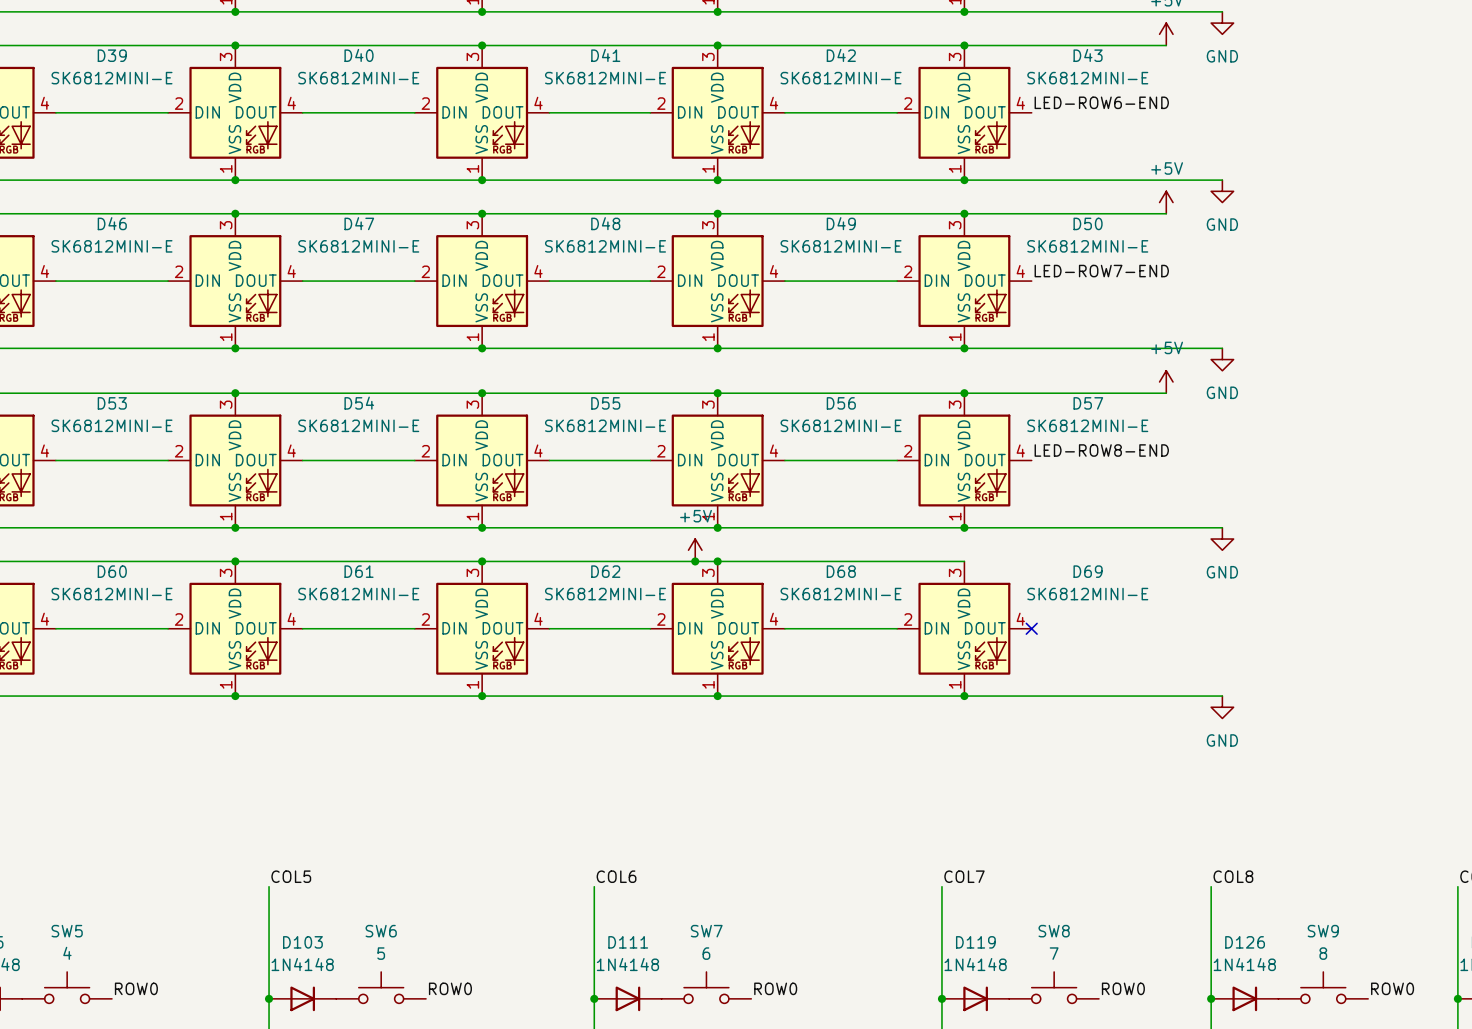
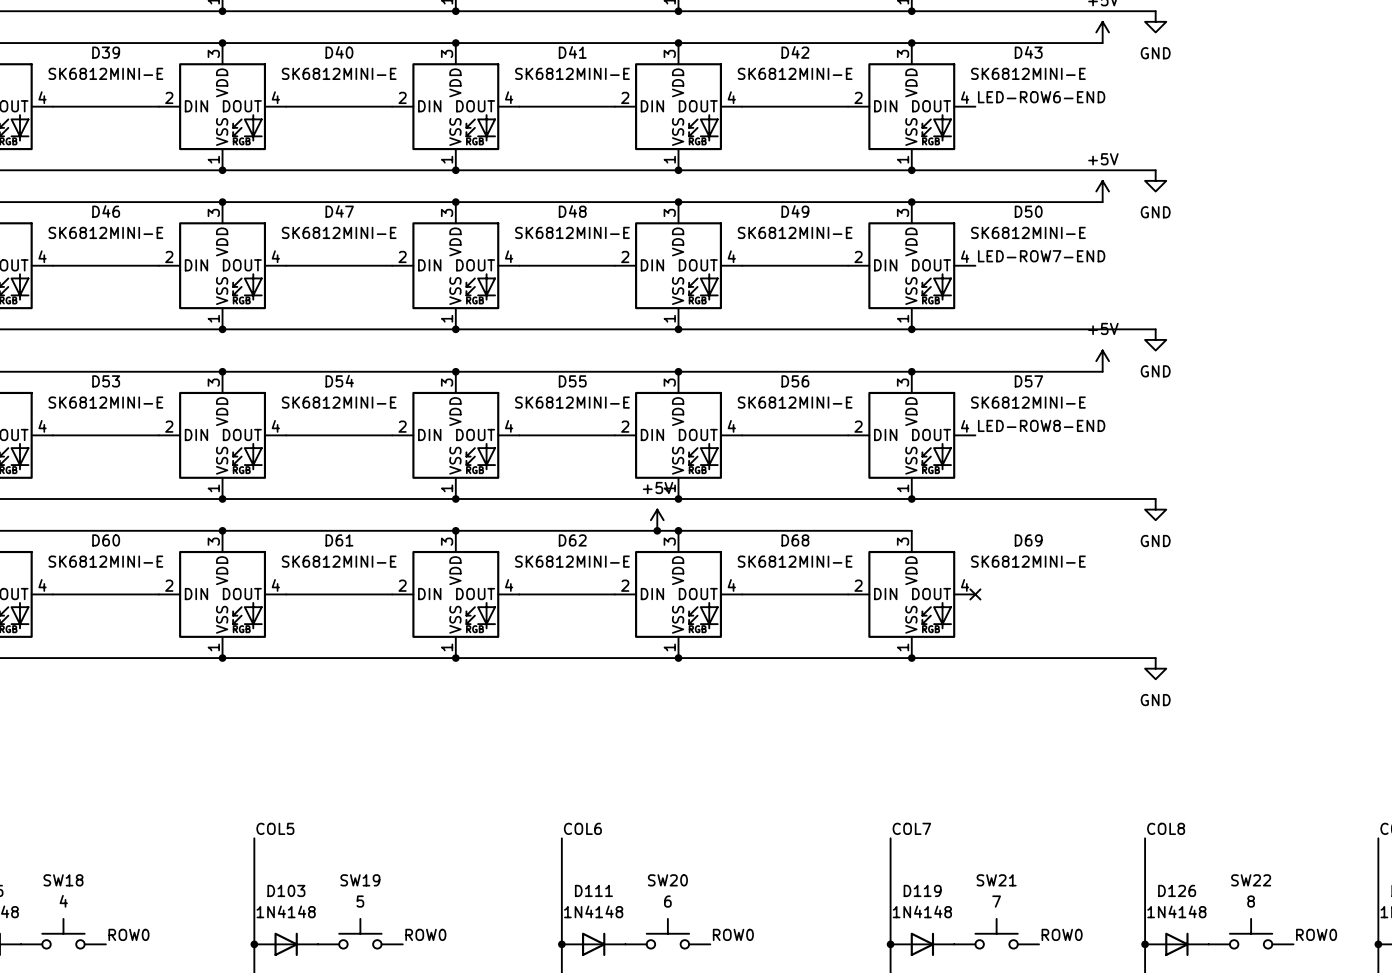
SW5 name: SW5 (67, 931) -> SW18 (63, 880)
SW6 name: SW6 (381, 931) -> SW19 (360, 880)
SW7 name: SW7 (706, 931) -> SW20 (667, 880)
SW8 name: SW8 (1054, 931) -> SW21 (996, 880)
SW9 name: SW9 (1323, 931) -> SW22 (1251, 880)

